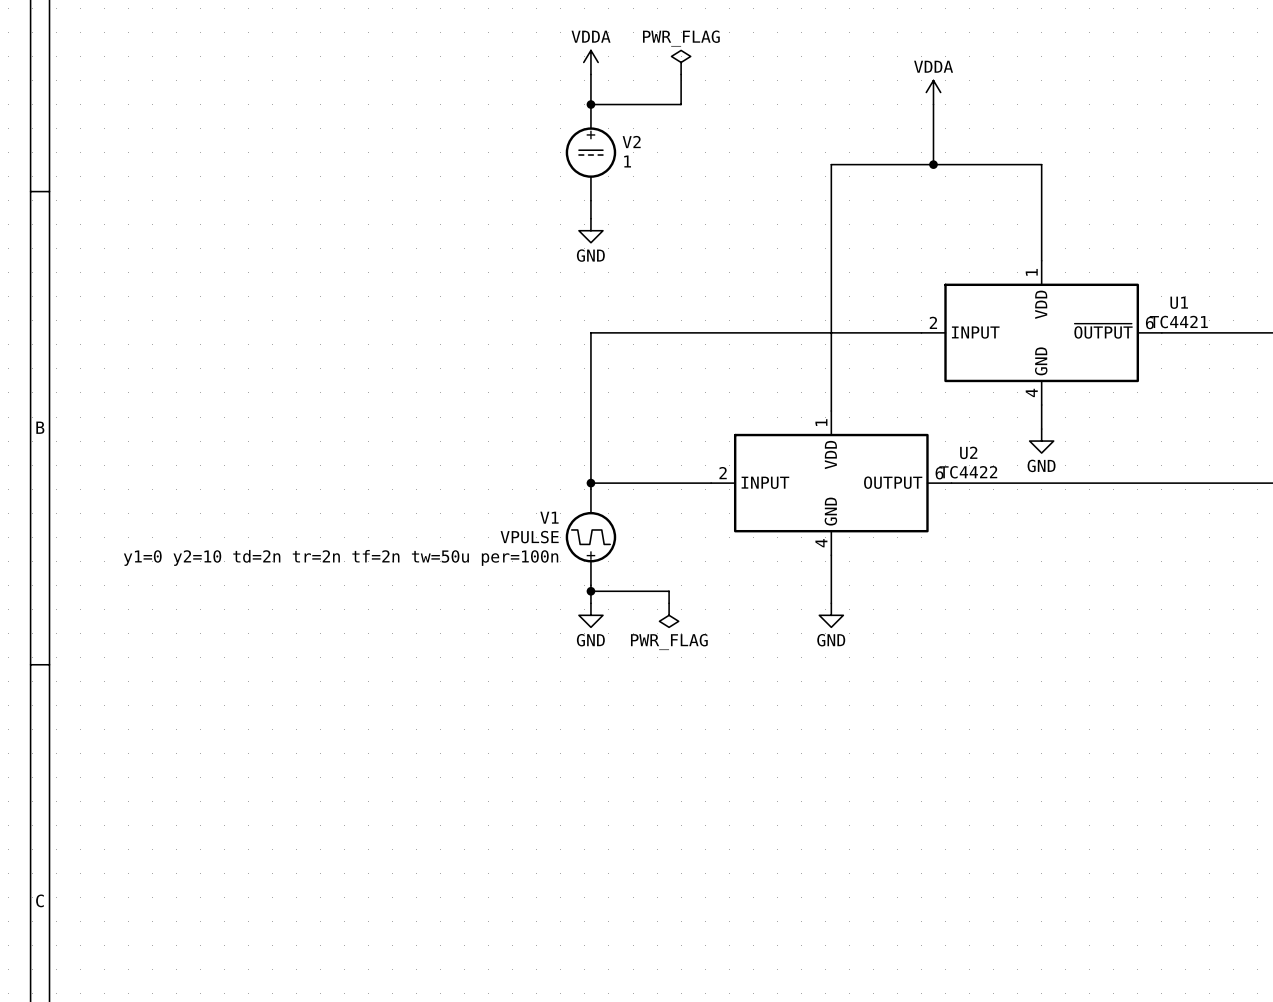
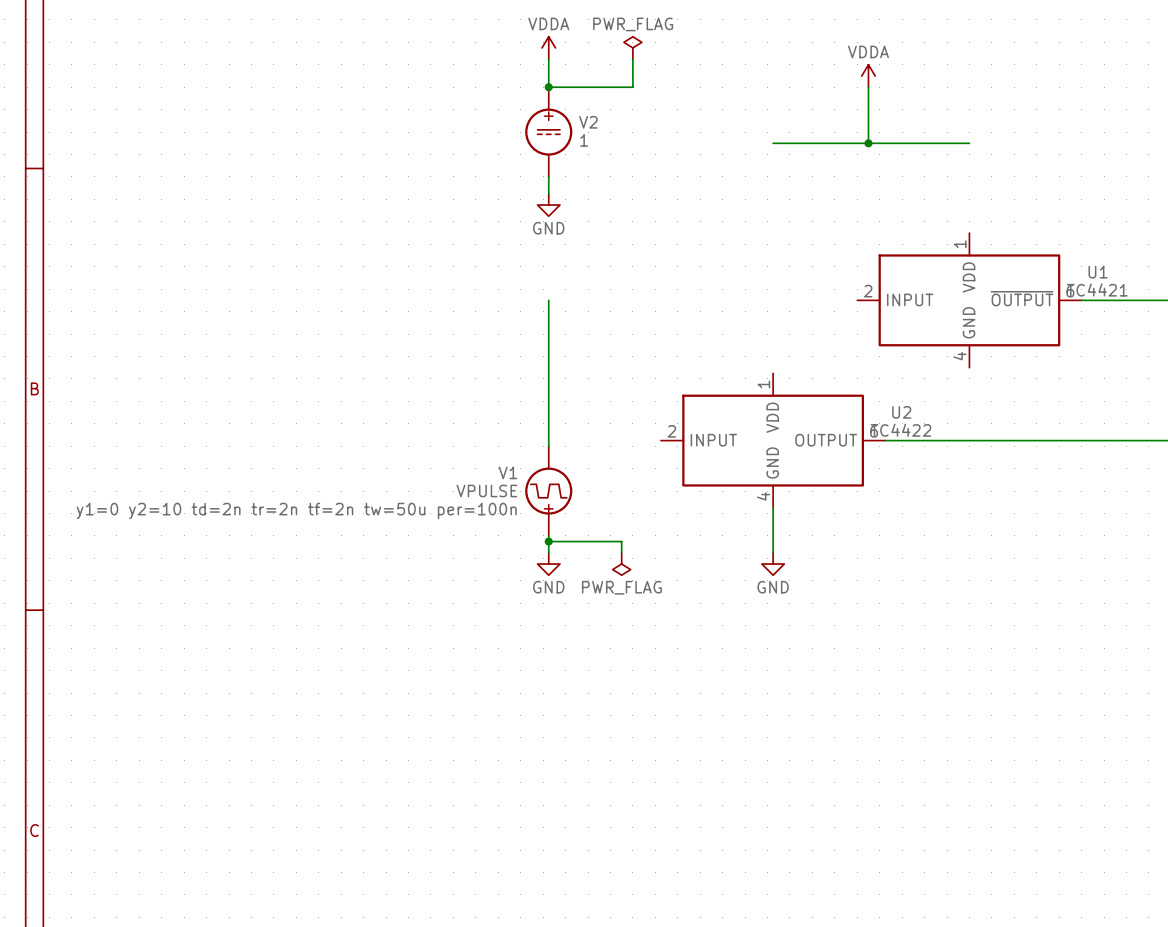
wire: (831, 164) (831, 411) -> none
wire: (1041, 164) (1041, 260) -> none
wire: (590, 332) (921, 332) -> none
wire: (1041, 404) (1041, 429) -> none
power symbol: GND (1041, 441) -> none
wire: (590, 483) (711, 483) -> none
junction: (590, 483) -> none

